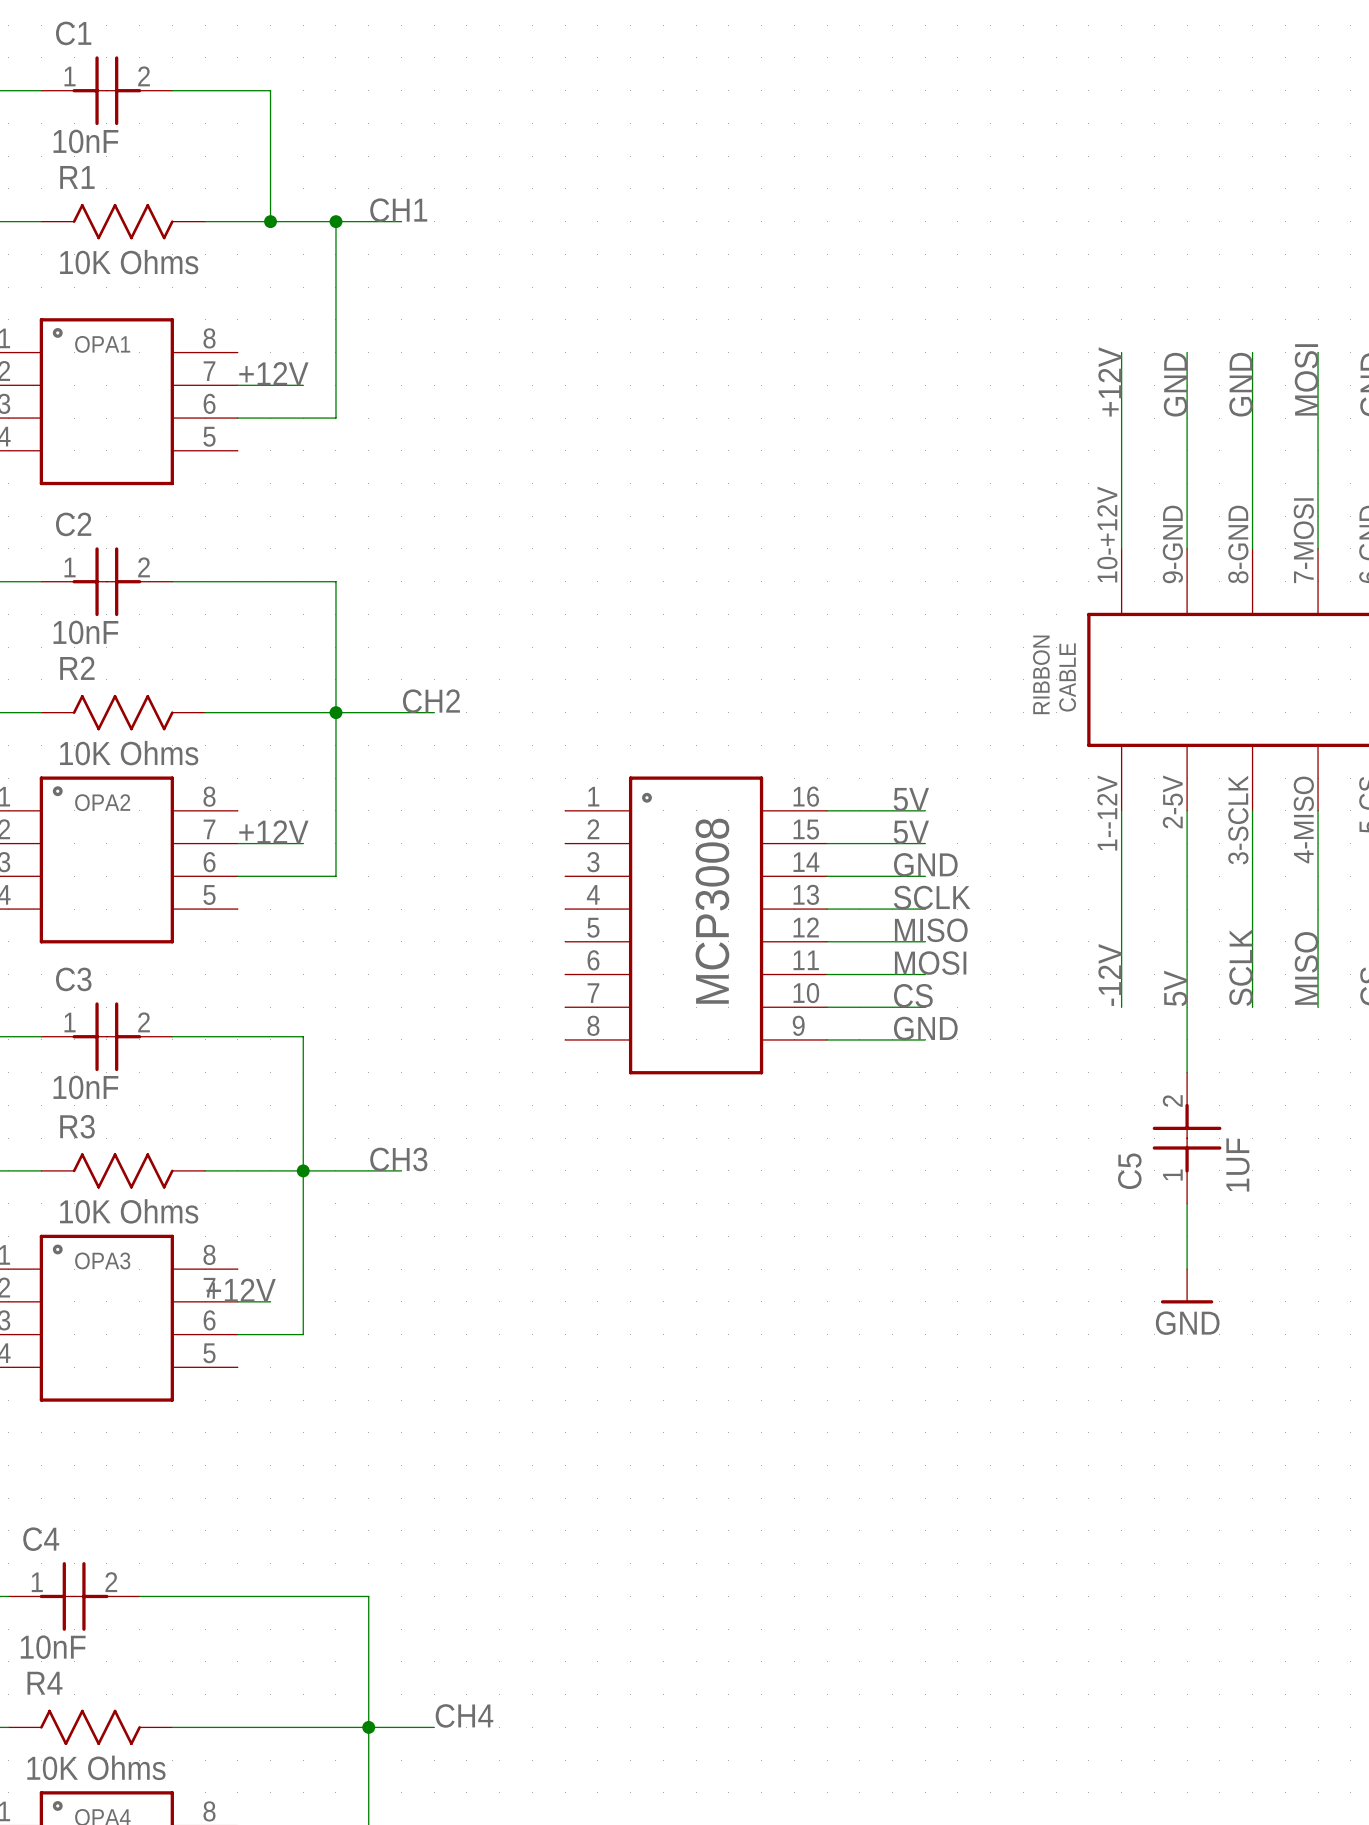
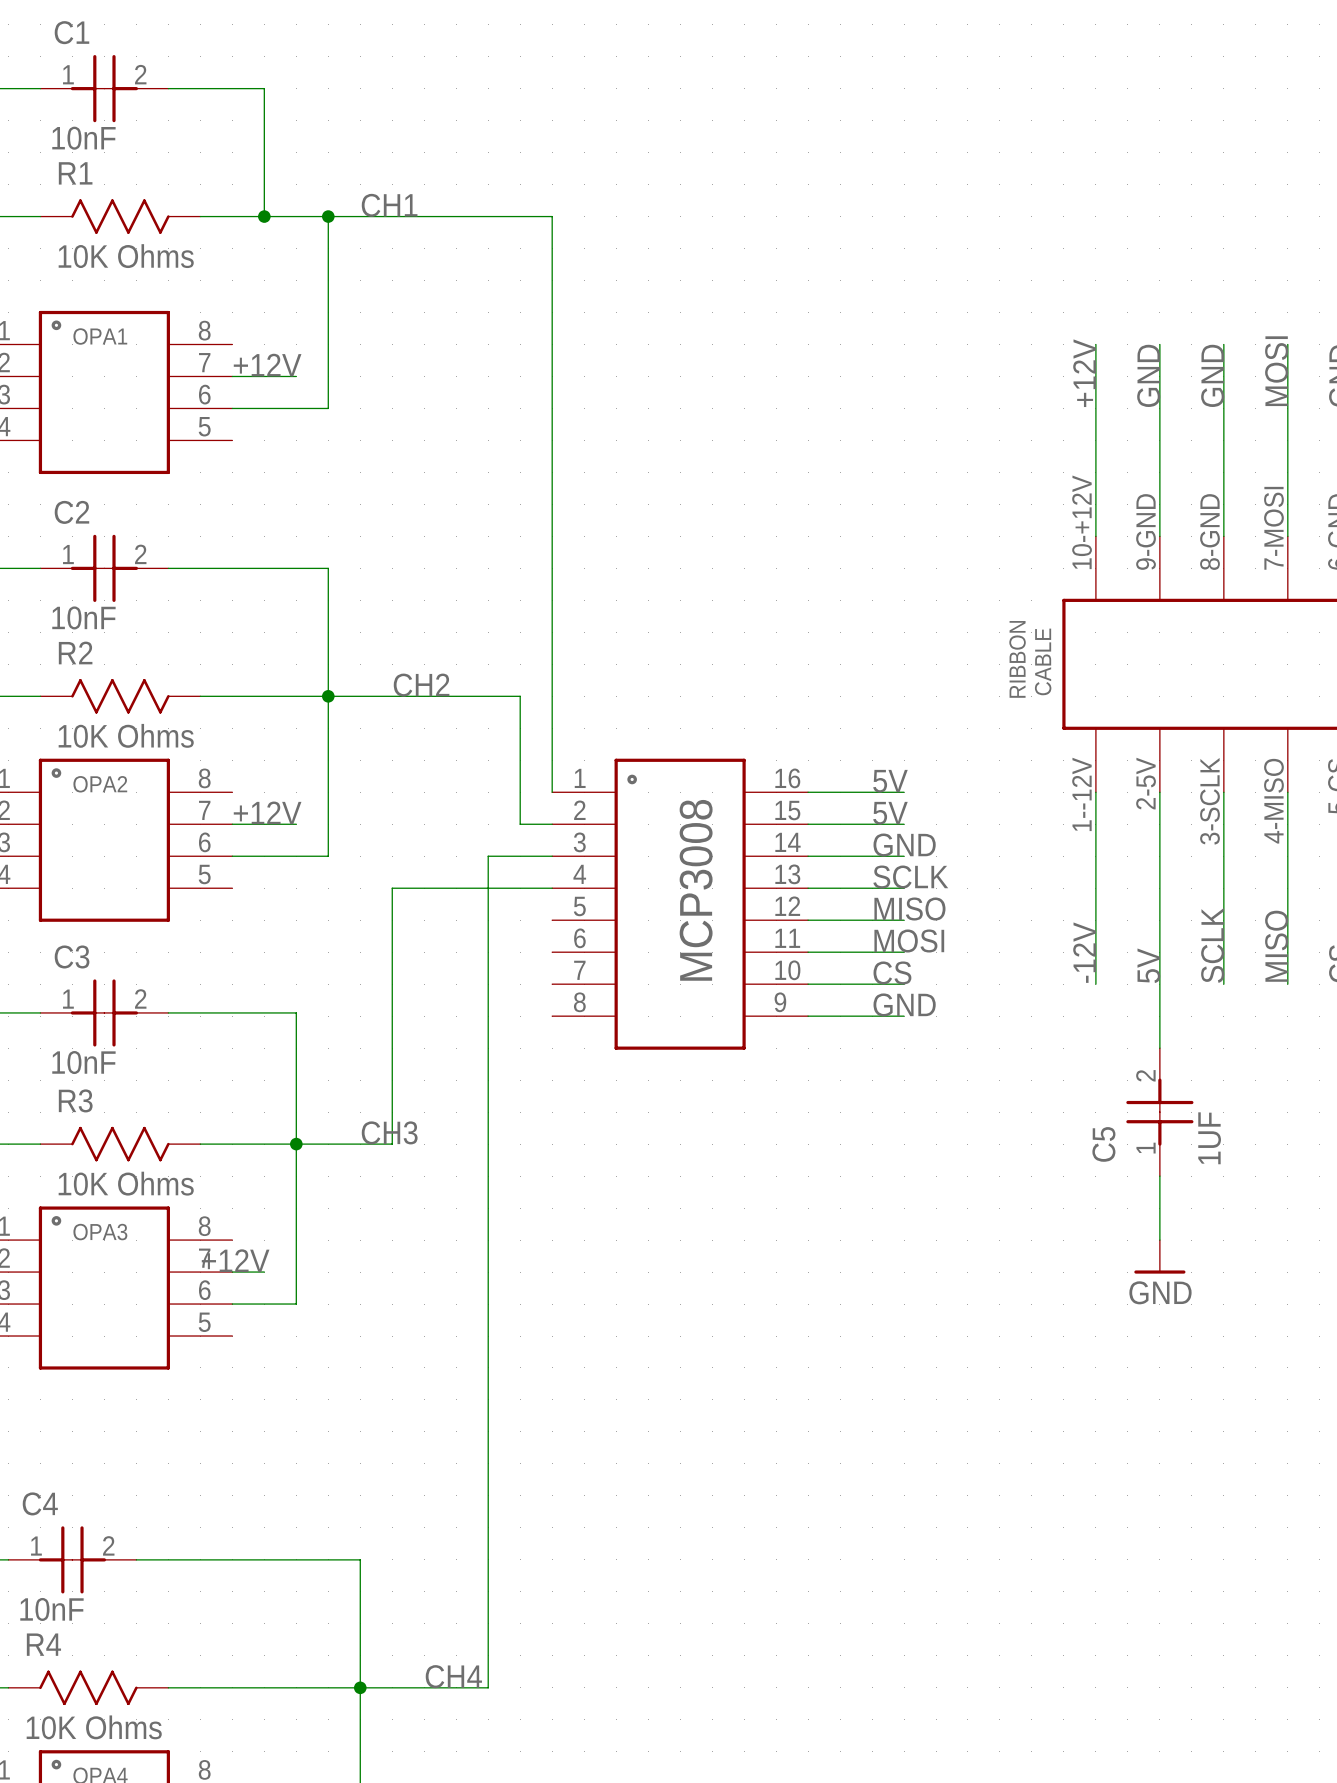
wire: none -> (392, 216) (552, 216) (552, 792)
wire: none -> (424, 696) (520, 696) (520, 824) (552, 824)
wire: none -> (552, 856) (488, 856) (488, 1687) (424, 1687)
wire: none -> (552, 888) (392, 888) (392, 1144)

